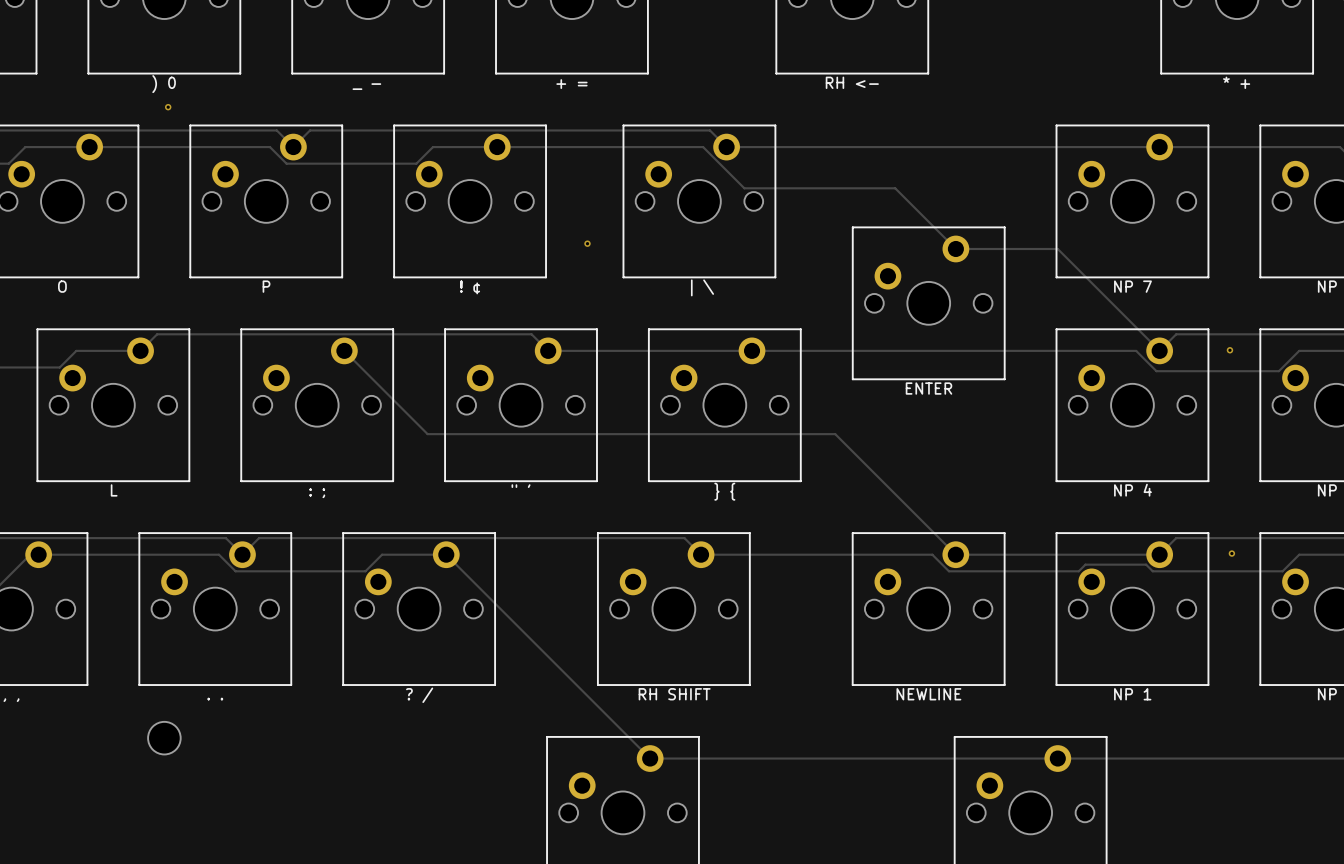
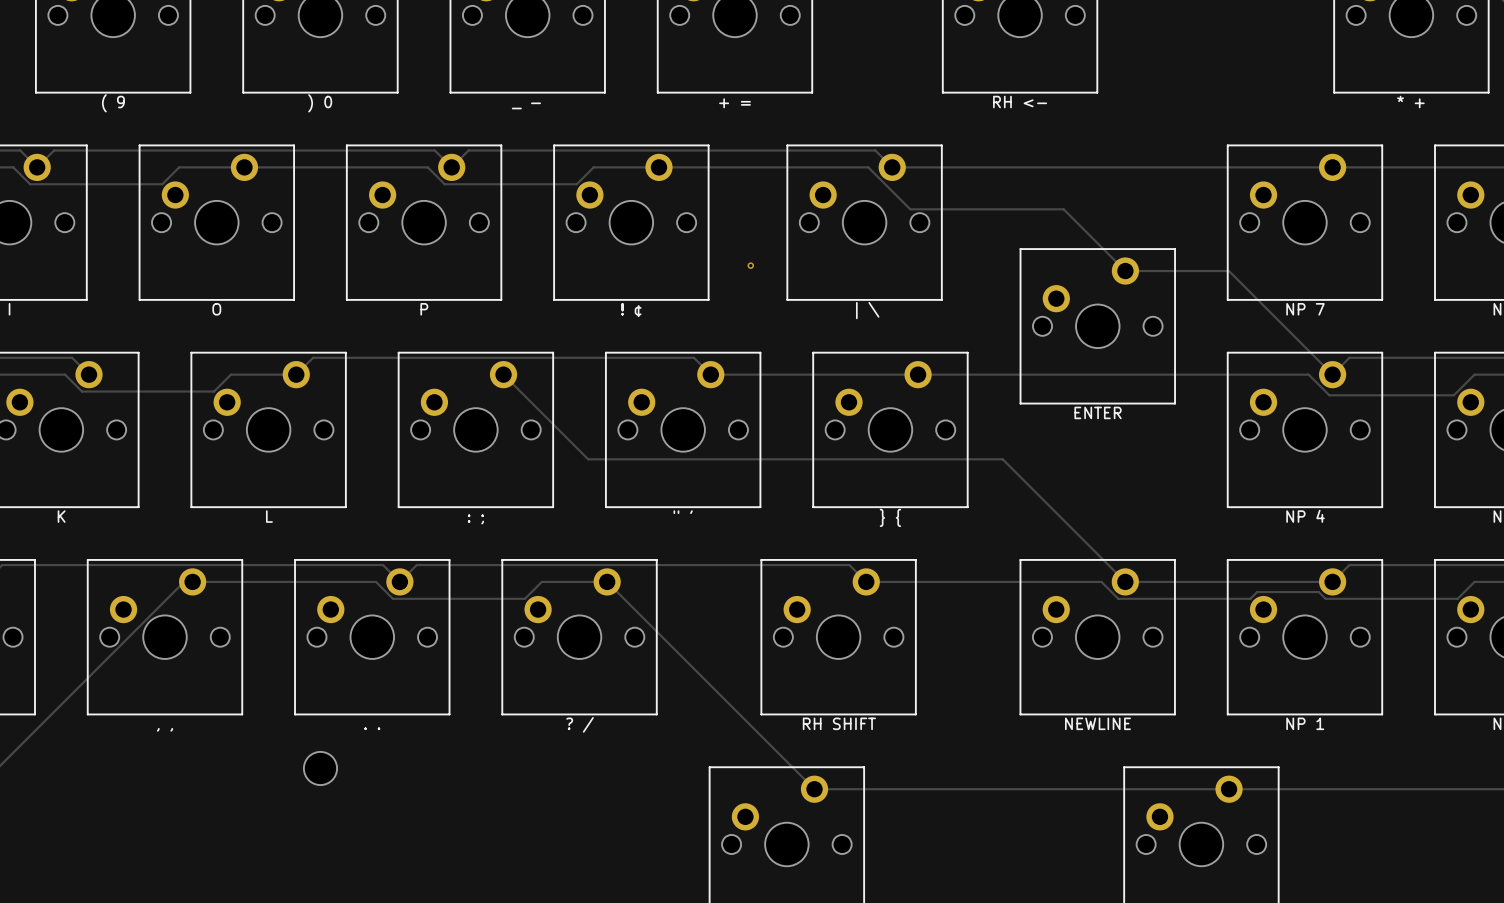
via: (168, 107) -> none
via: (1229, 350) -> none
via: (1231, 553) -> none

